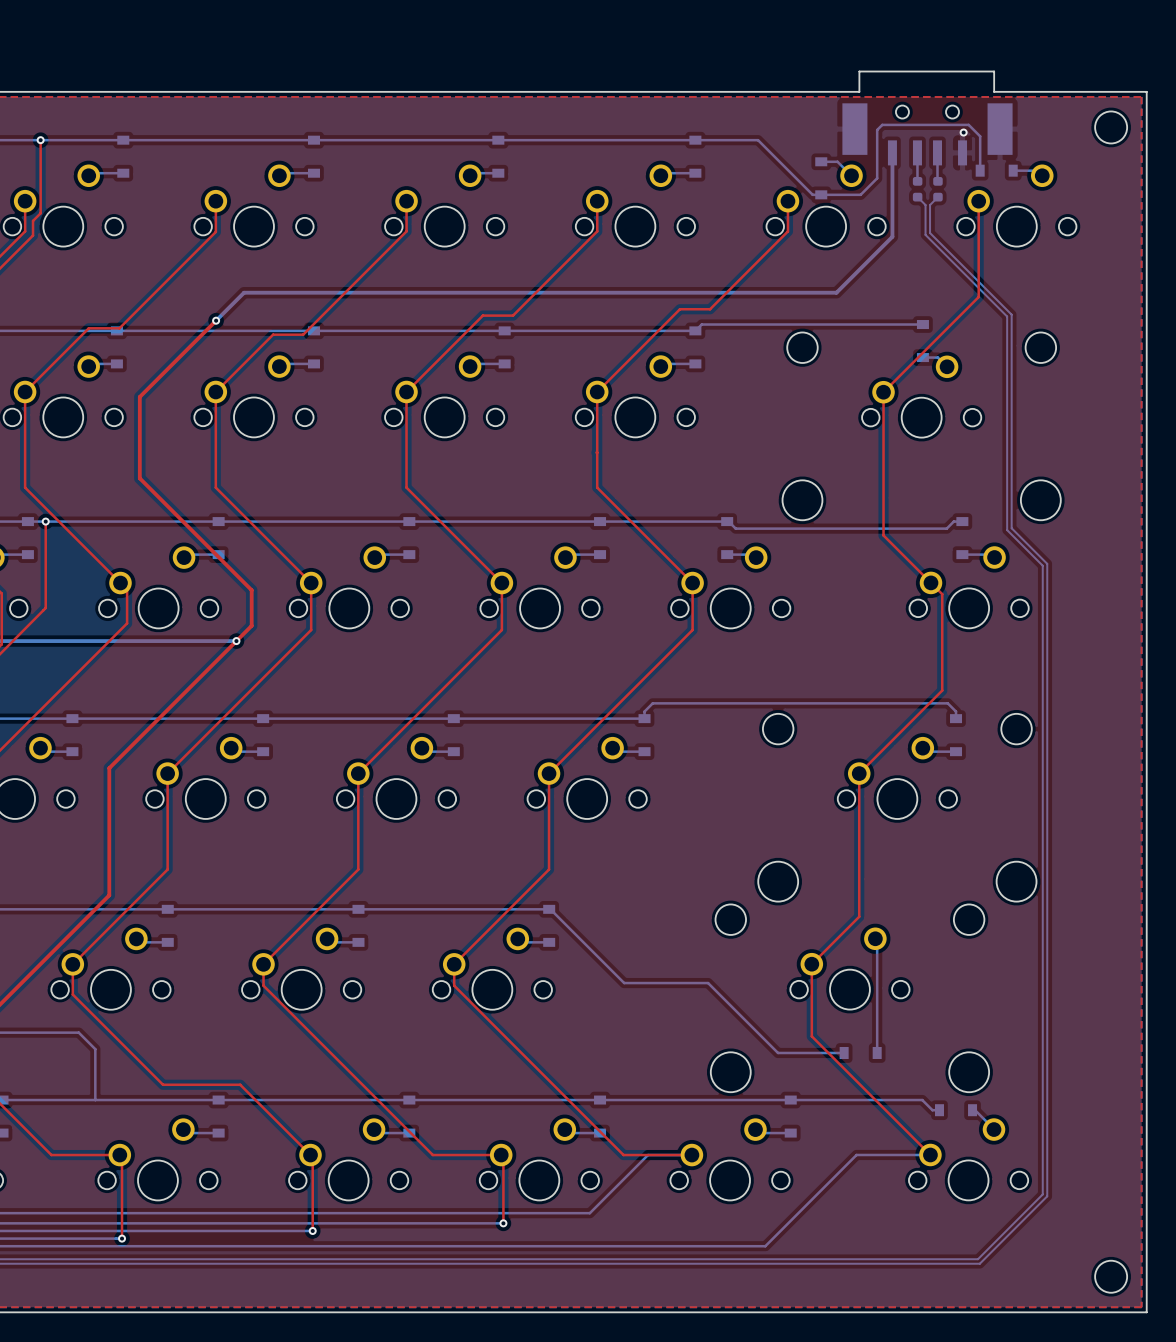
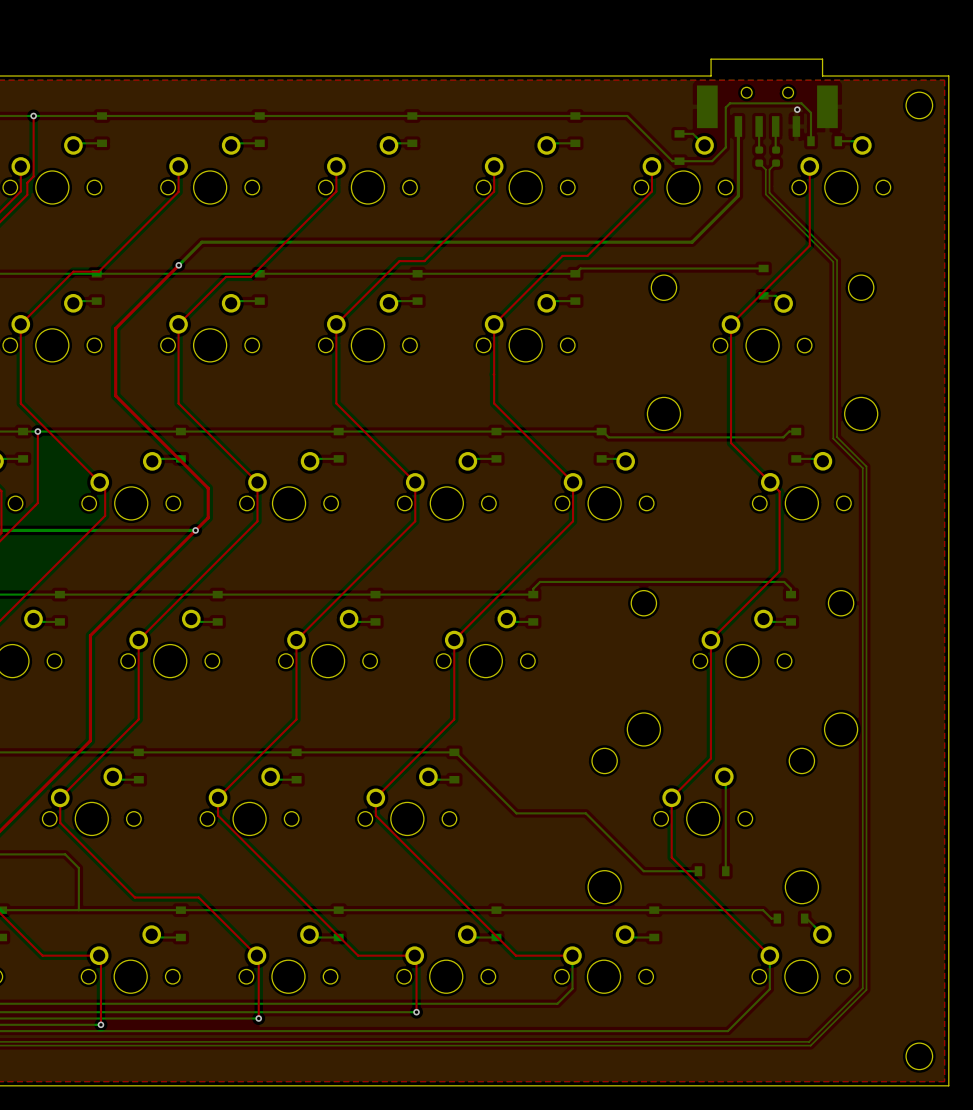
bottom track: (930, 1154) (856, 1154) (765, 1246) -> (769, 955) (769, 989) (727, 1031) (633, 1031)
bottom track: (691, 1155) (647, 1155) (589, 1213) -> (572, 955) (572, 988) (557, 1003) (488, 1003)

